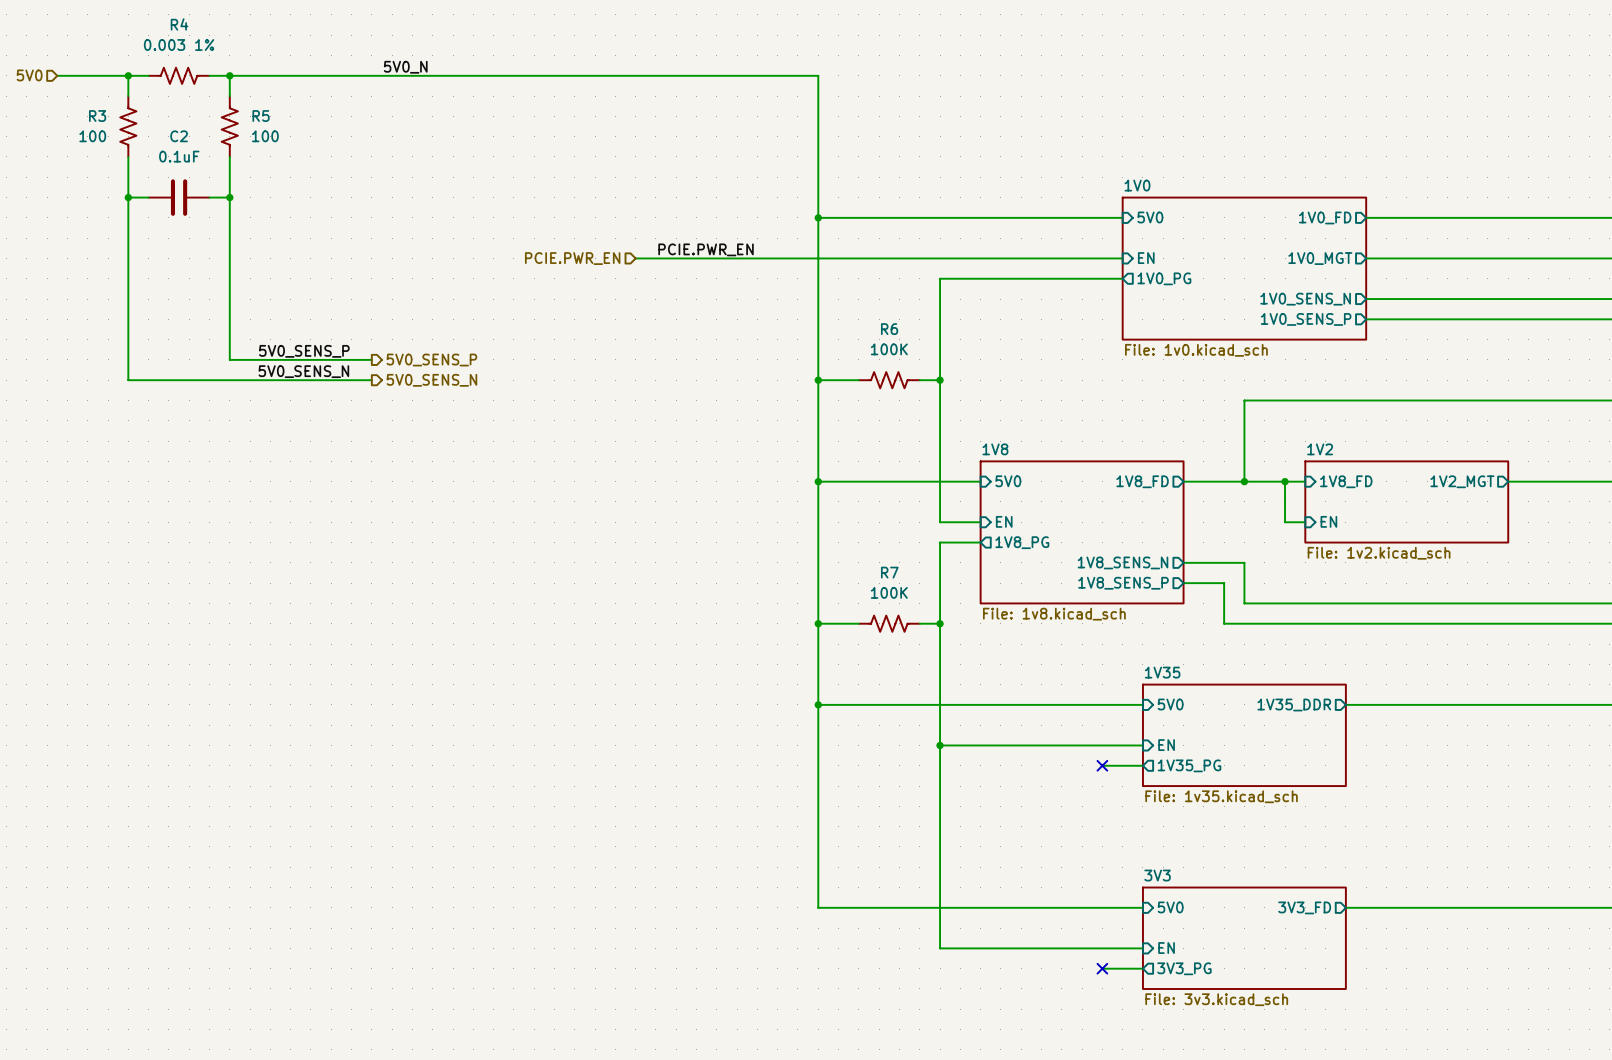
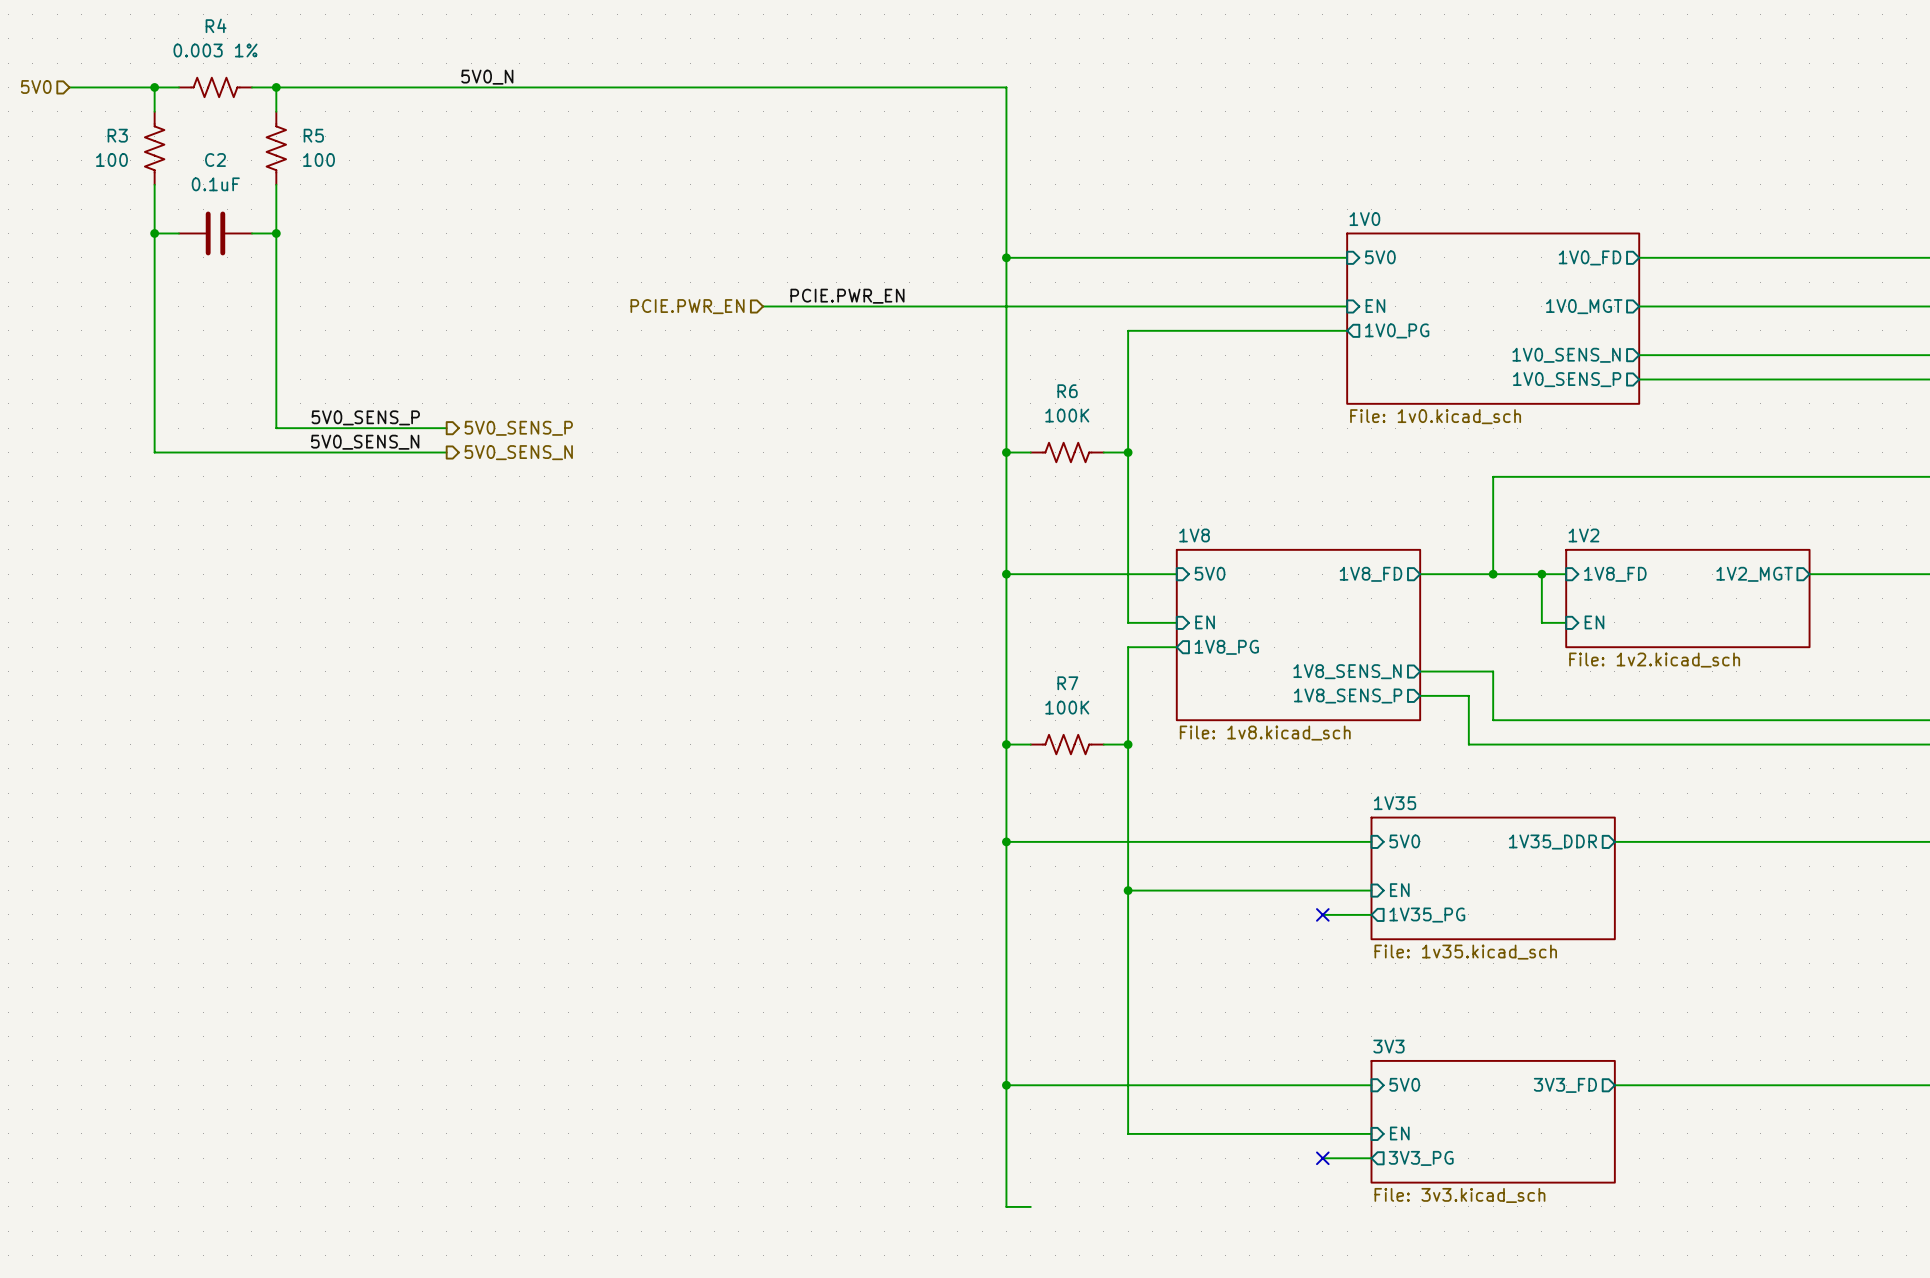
wire: (818, 75) (818, 907) (838, 907) -> (982, 87) (1006, 87) (1006, 1206) (1030, 1206)
wire: (818, 217) (838, 217) -> none
junction position: (818, 217) -> (1006, 257)
wire: (818, 380) (838, 380) -> none
junction position: (818, 380) -> (1006, 452)
wire: (818, 481) (838, 481) -> none
junction position: (818, 481) -> (1006, 574)
wire: (818, 623) (838, 623) -> none
junction position: (818, 623) -> (1006, 744)
wire: (818, 704) (838, 704) -> none
junction position: (818, 704) -> (1006, 841)
junction: none -> (1006, 1085)

